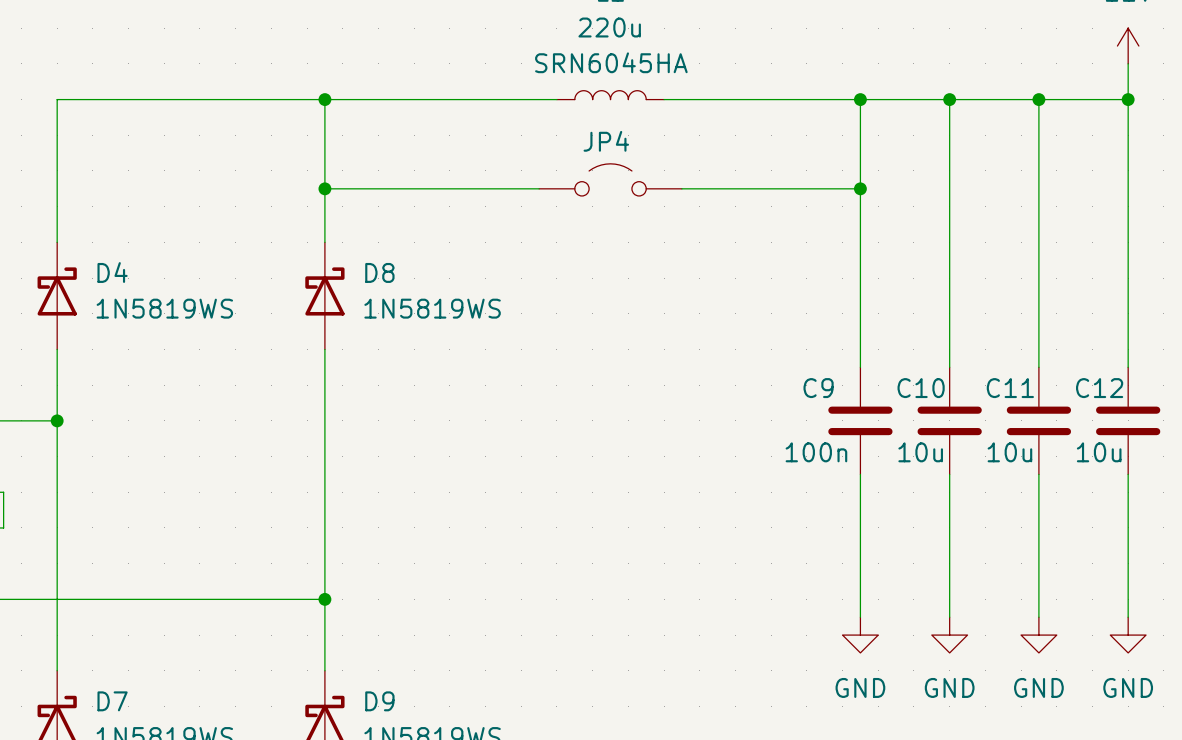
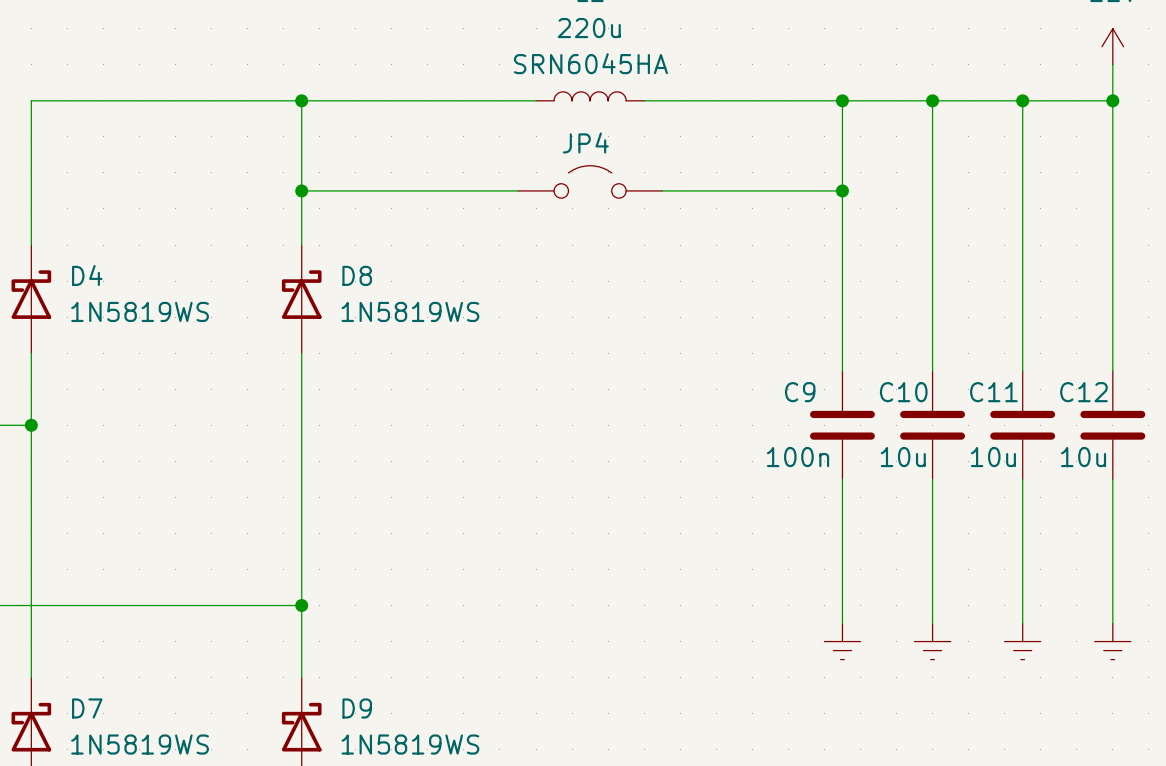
power symbol shape: [842, 617, 879, 653] -> [824, 623, 861, 660]
power symbol shape: [931, 617, 968, 653] -> [914, 623, 951, 660]
power symbol shape: [1021, 617, 1057, 653] -> [1004, 623, 1041, 660]
power symbol shape: [1110, 617, 1147, 653] -> [1094, 623, 1131, 660]
power symbol text: GND (860, 687) -> none
power symbol text: GND (949, 687) -> none
power symbol text: GND (1038, 687) -> none
power symbol text: GND (1128, 687) -> none

